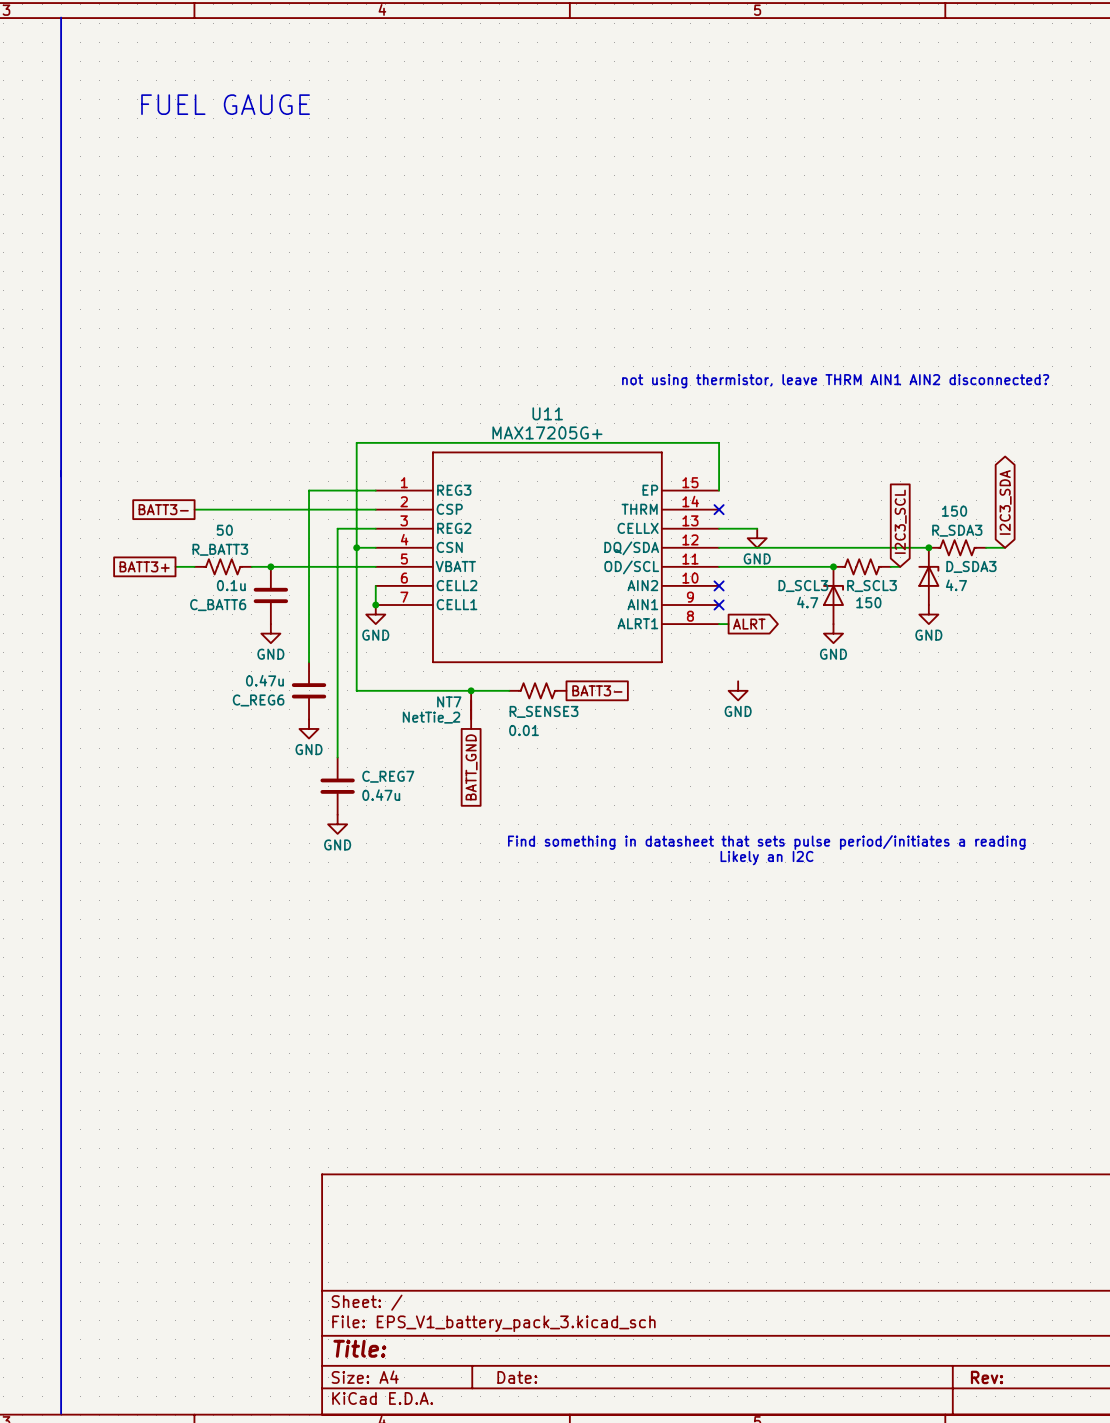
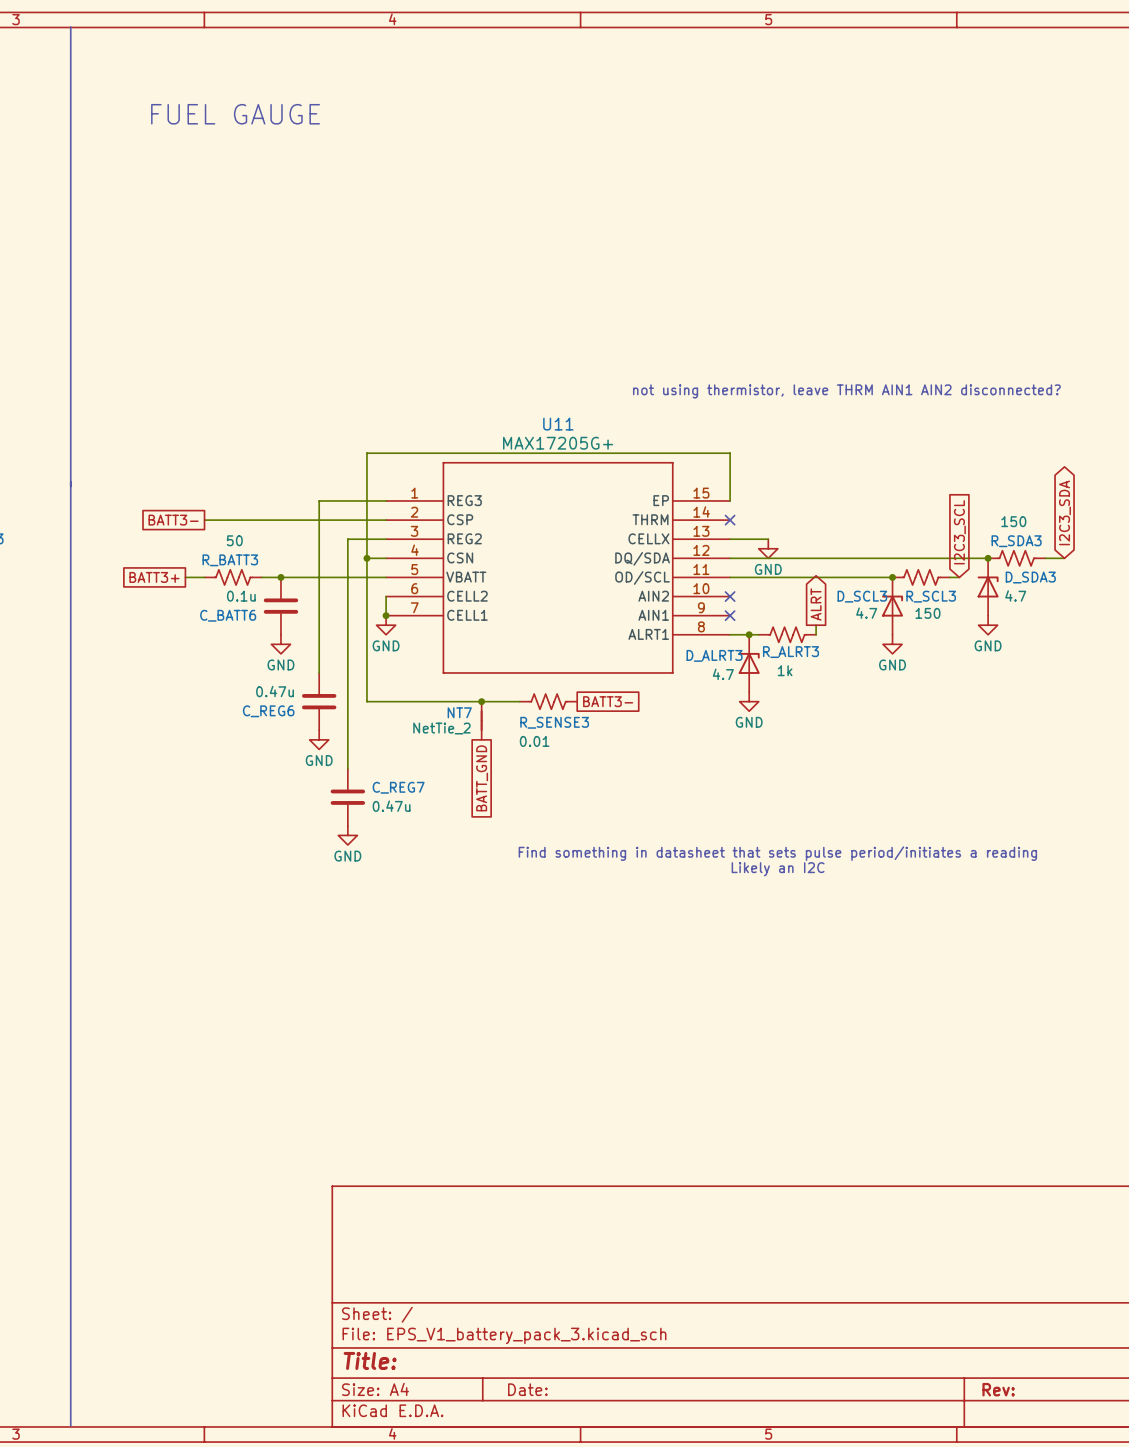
global label position: I2C3_SDA (1005, 502) -> I2C3_SDA (1064, 512)
global label position: I2C3_SCL (900, 521) -> I2C3_SCL (959, 532)
junction: (928, 547) -> none
R_SDA3 position: (957, 547) -> (1016, 558)
junction: none -> (988, 558)
wire: (986, 547) (1005, 547) -> (1045, 558) (1064, 558)
junction: (833, 566) -> none
R_SCL3 position: (862, 566) -> (921, 577)
junction: none -> (892, 577)
D_SDA3 position: (928, 576) -> (988, 586)
D_SCL3 position: (833, 595) -> (892, 606)
wire: none -> (816, 625) (816, 634)
power symbol: GND (928, 614) -> none
power symbol: none -> GND (988, 625)
wire: none -> (739, 634) (758, 634)
junction: none -> (749, 634)
global label rotation: 0° (749, 624) -> 90° counterclockwise (816, 604)
R_ALRT3: none -> 1k (787, 634)
power symbol: GND (833, 633) -> none
power symbol: none -> GND (892, 644)
D_ALRT3: none -> 4.7 (749, 663)

